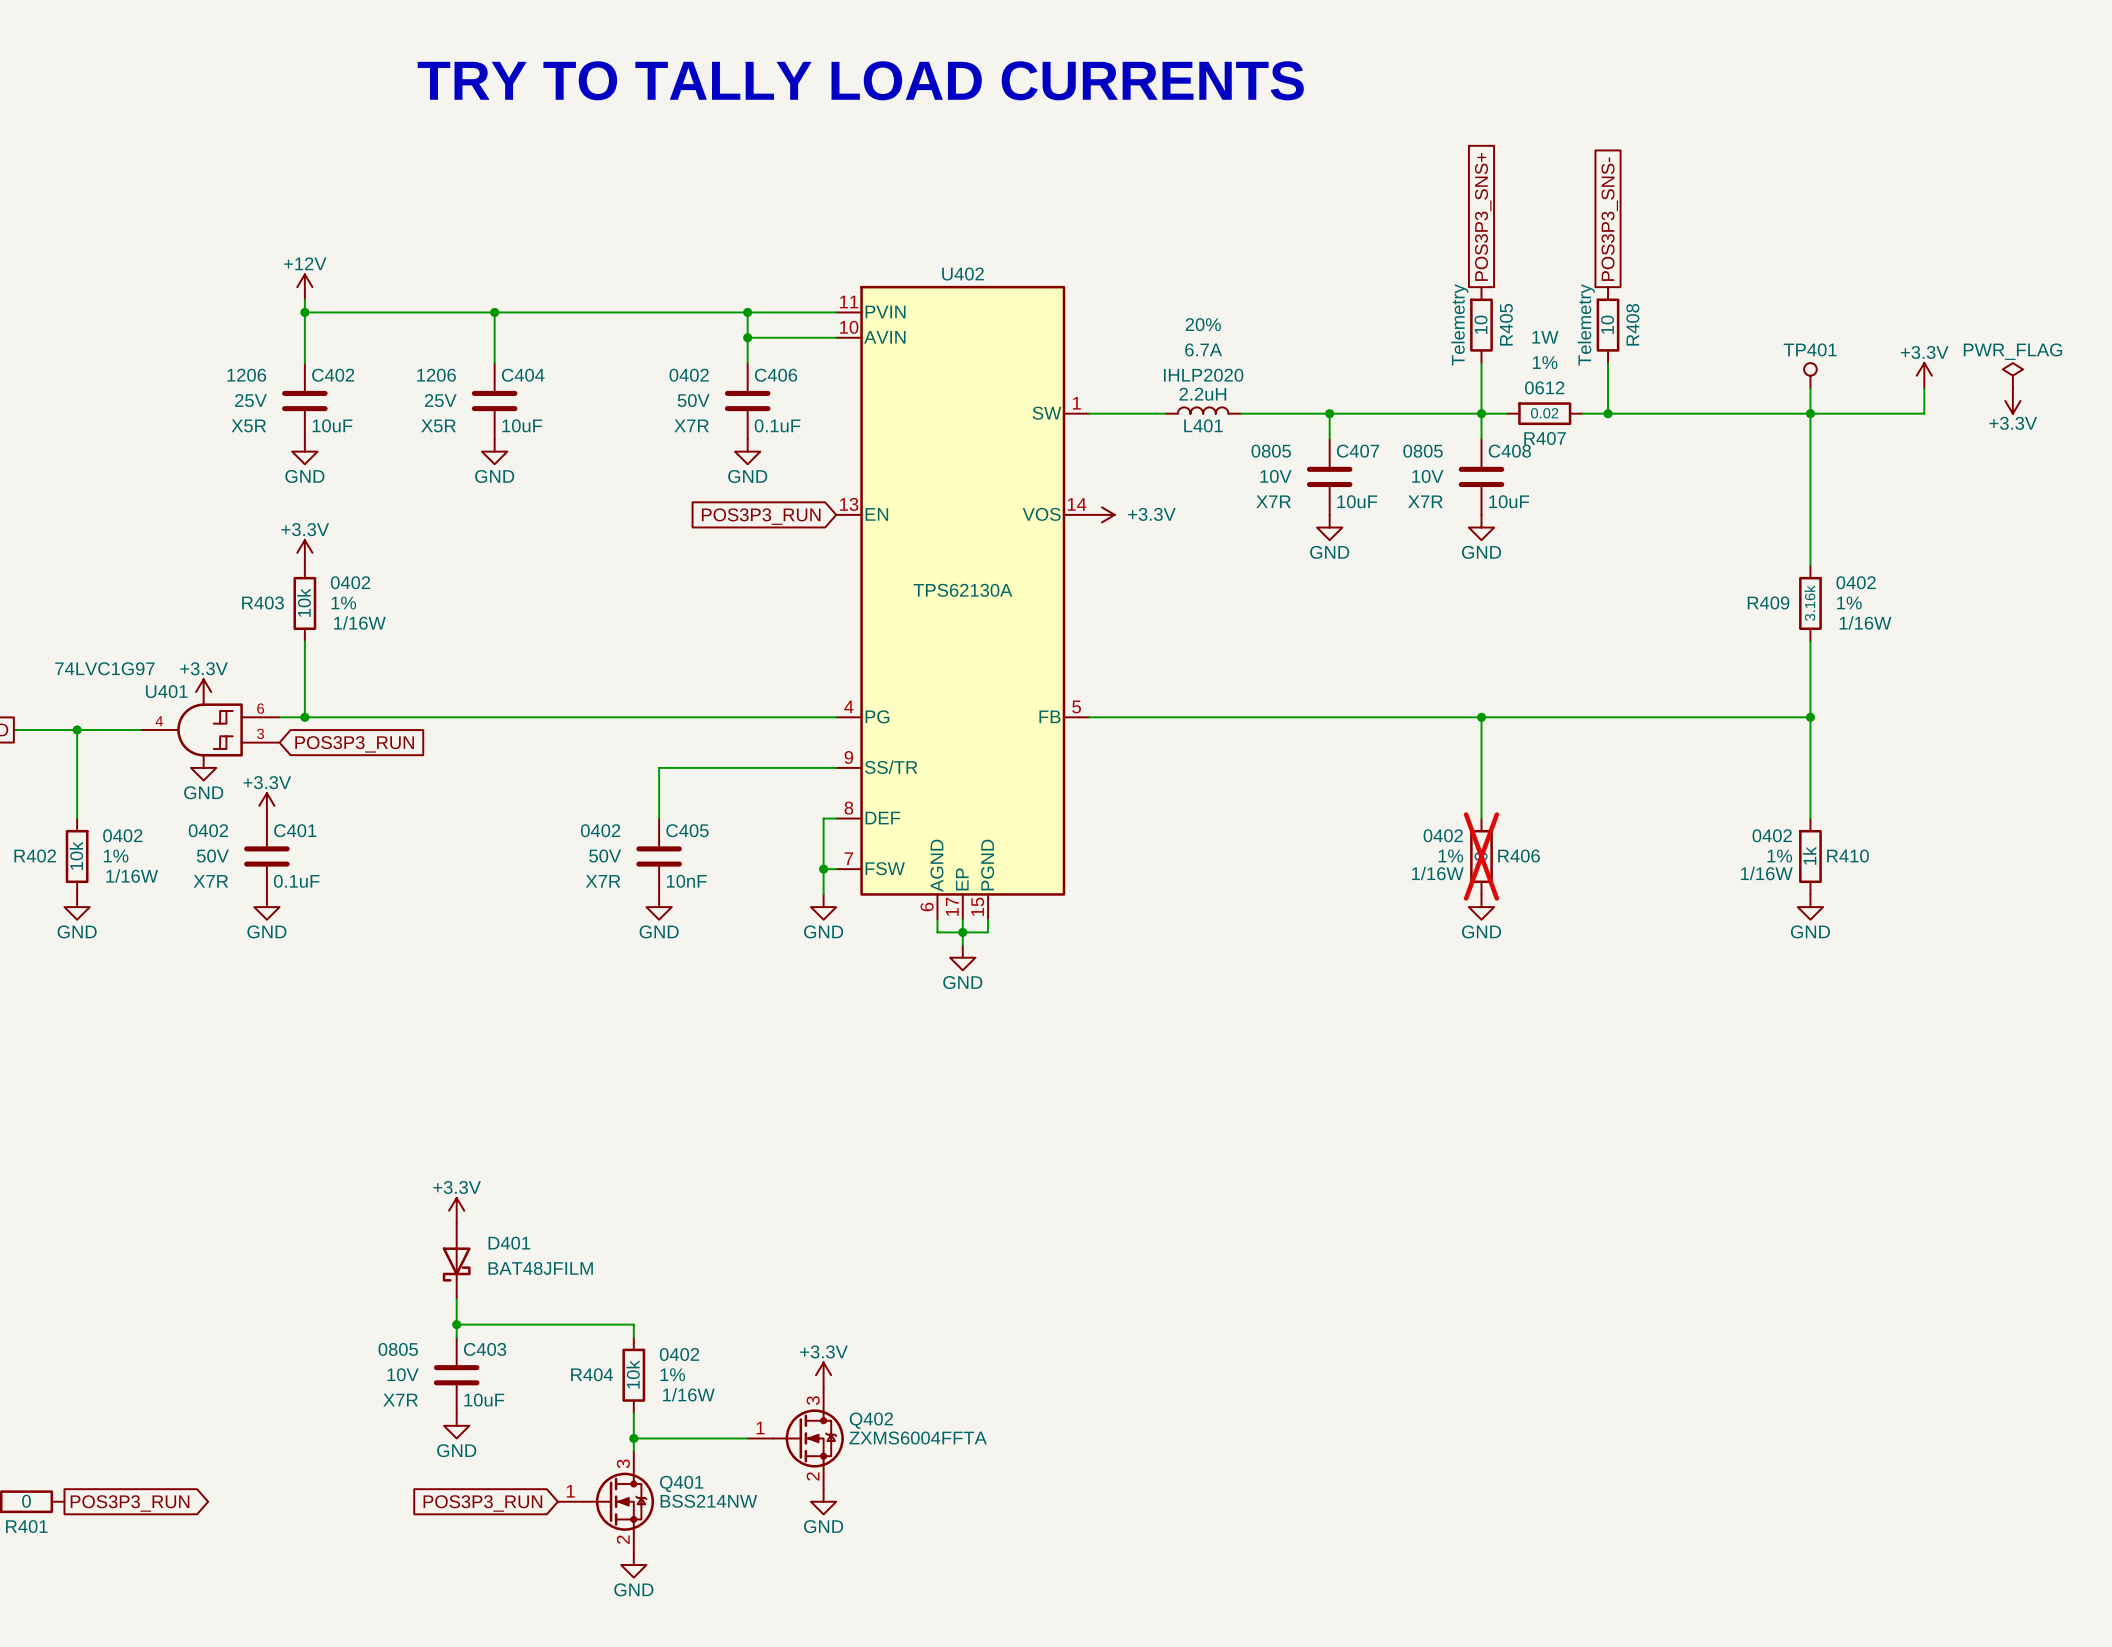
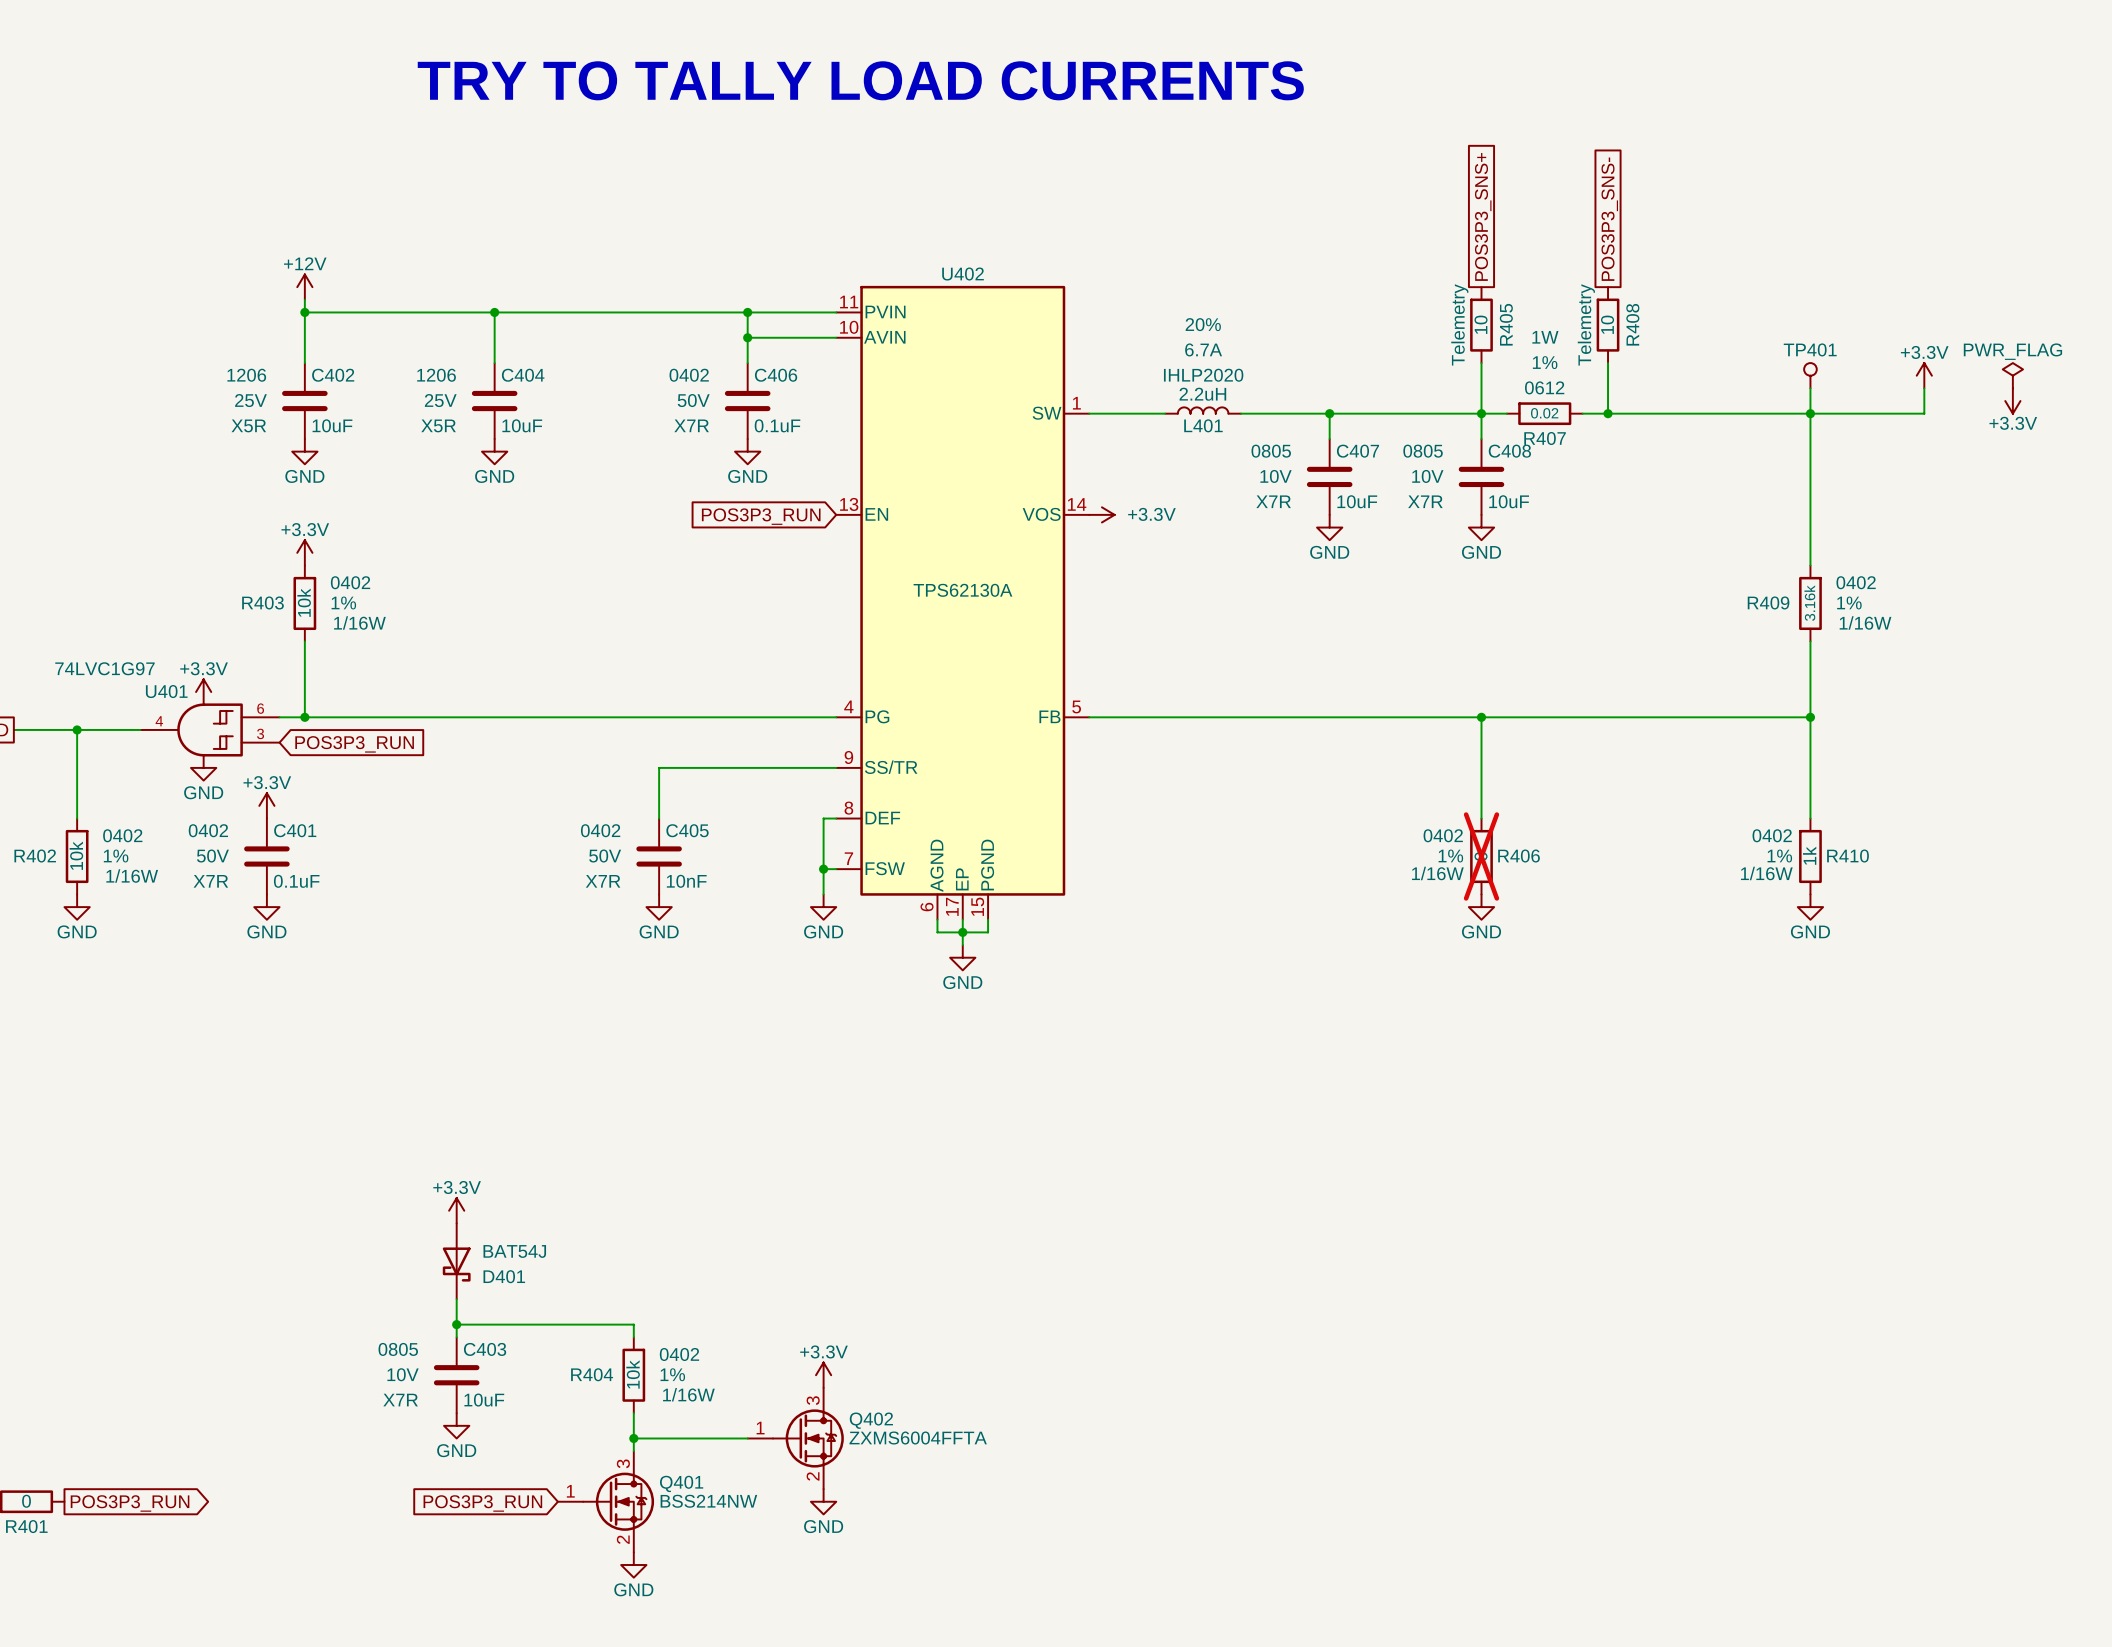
D401 name position: D401 (509, 1243) -> D401 (504, 1276)
D401 flip: as is (456, 1264) -> left-right (456, 1264)
D401 value: BAT48JFILM (540, 1268) -> BAT54J (514, 1251)

